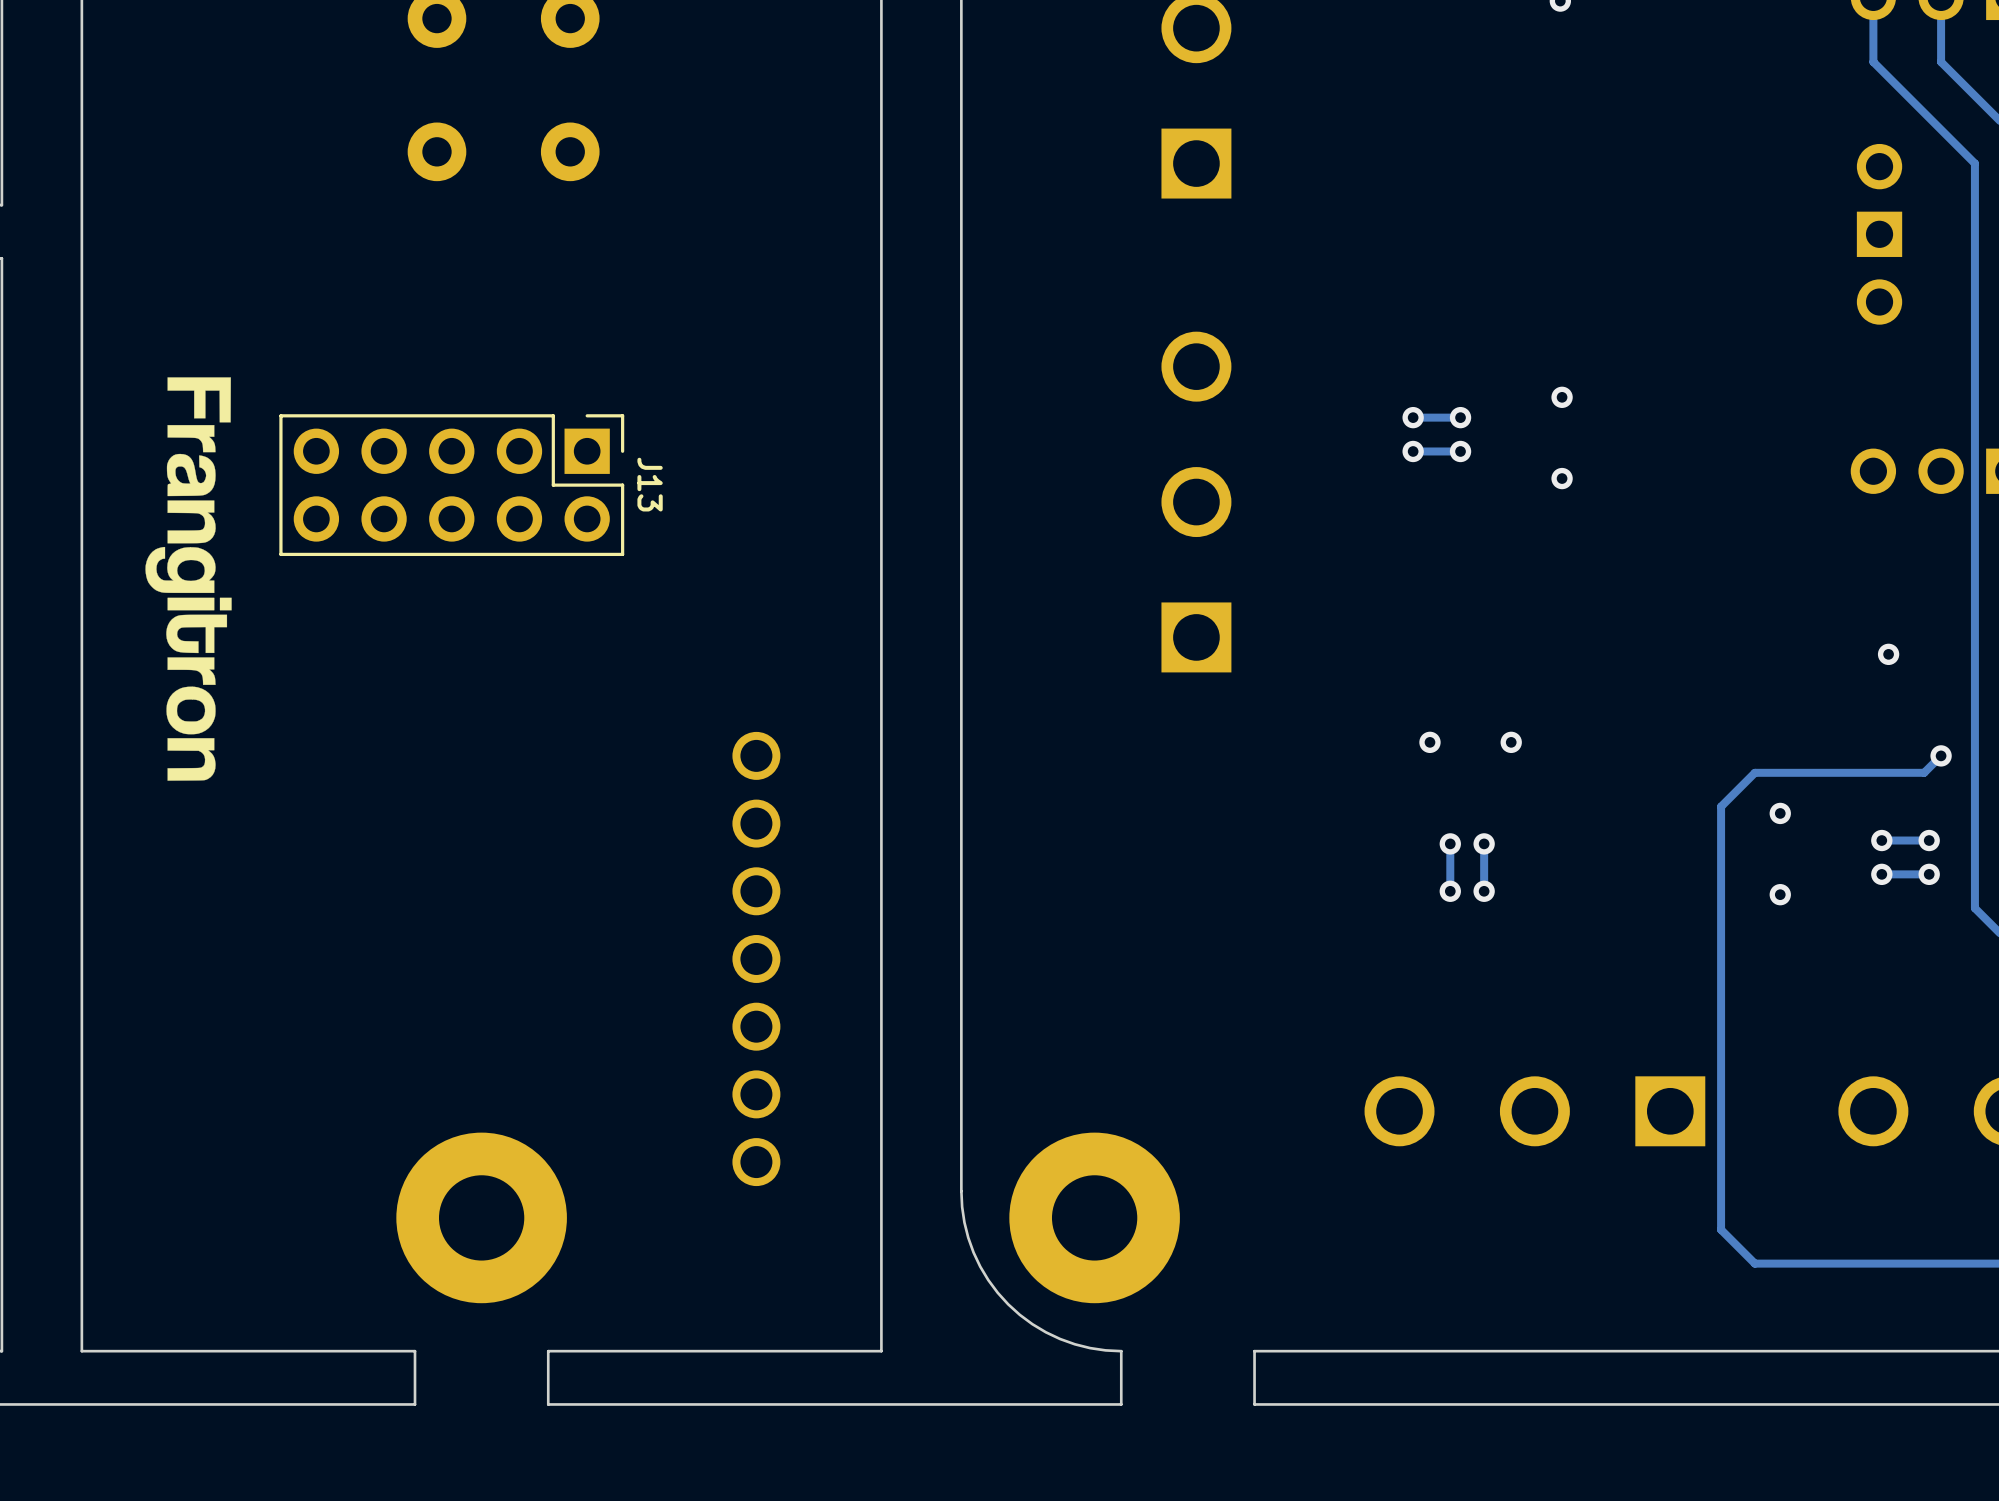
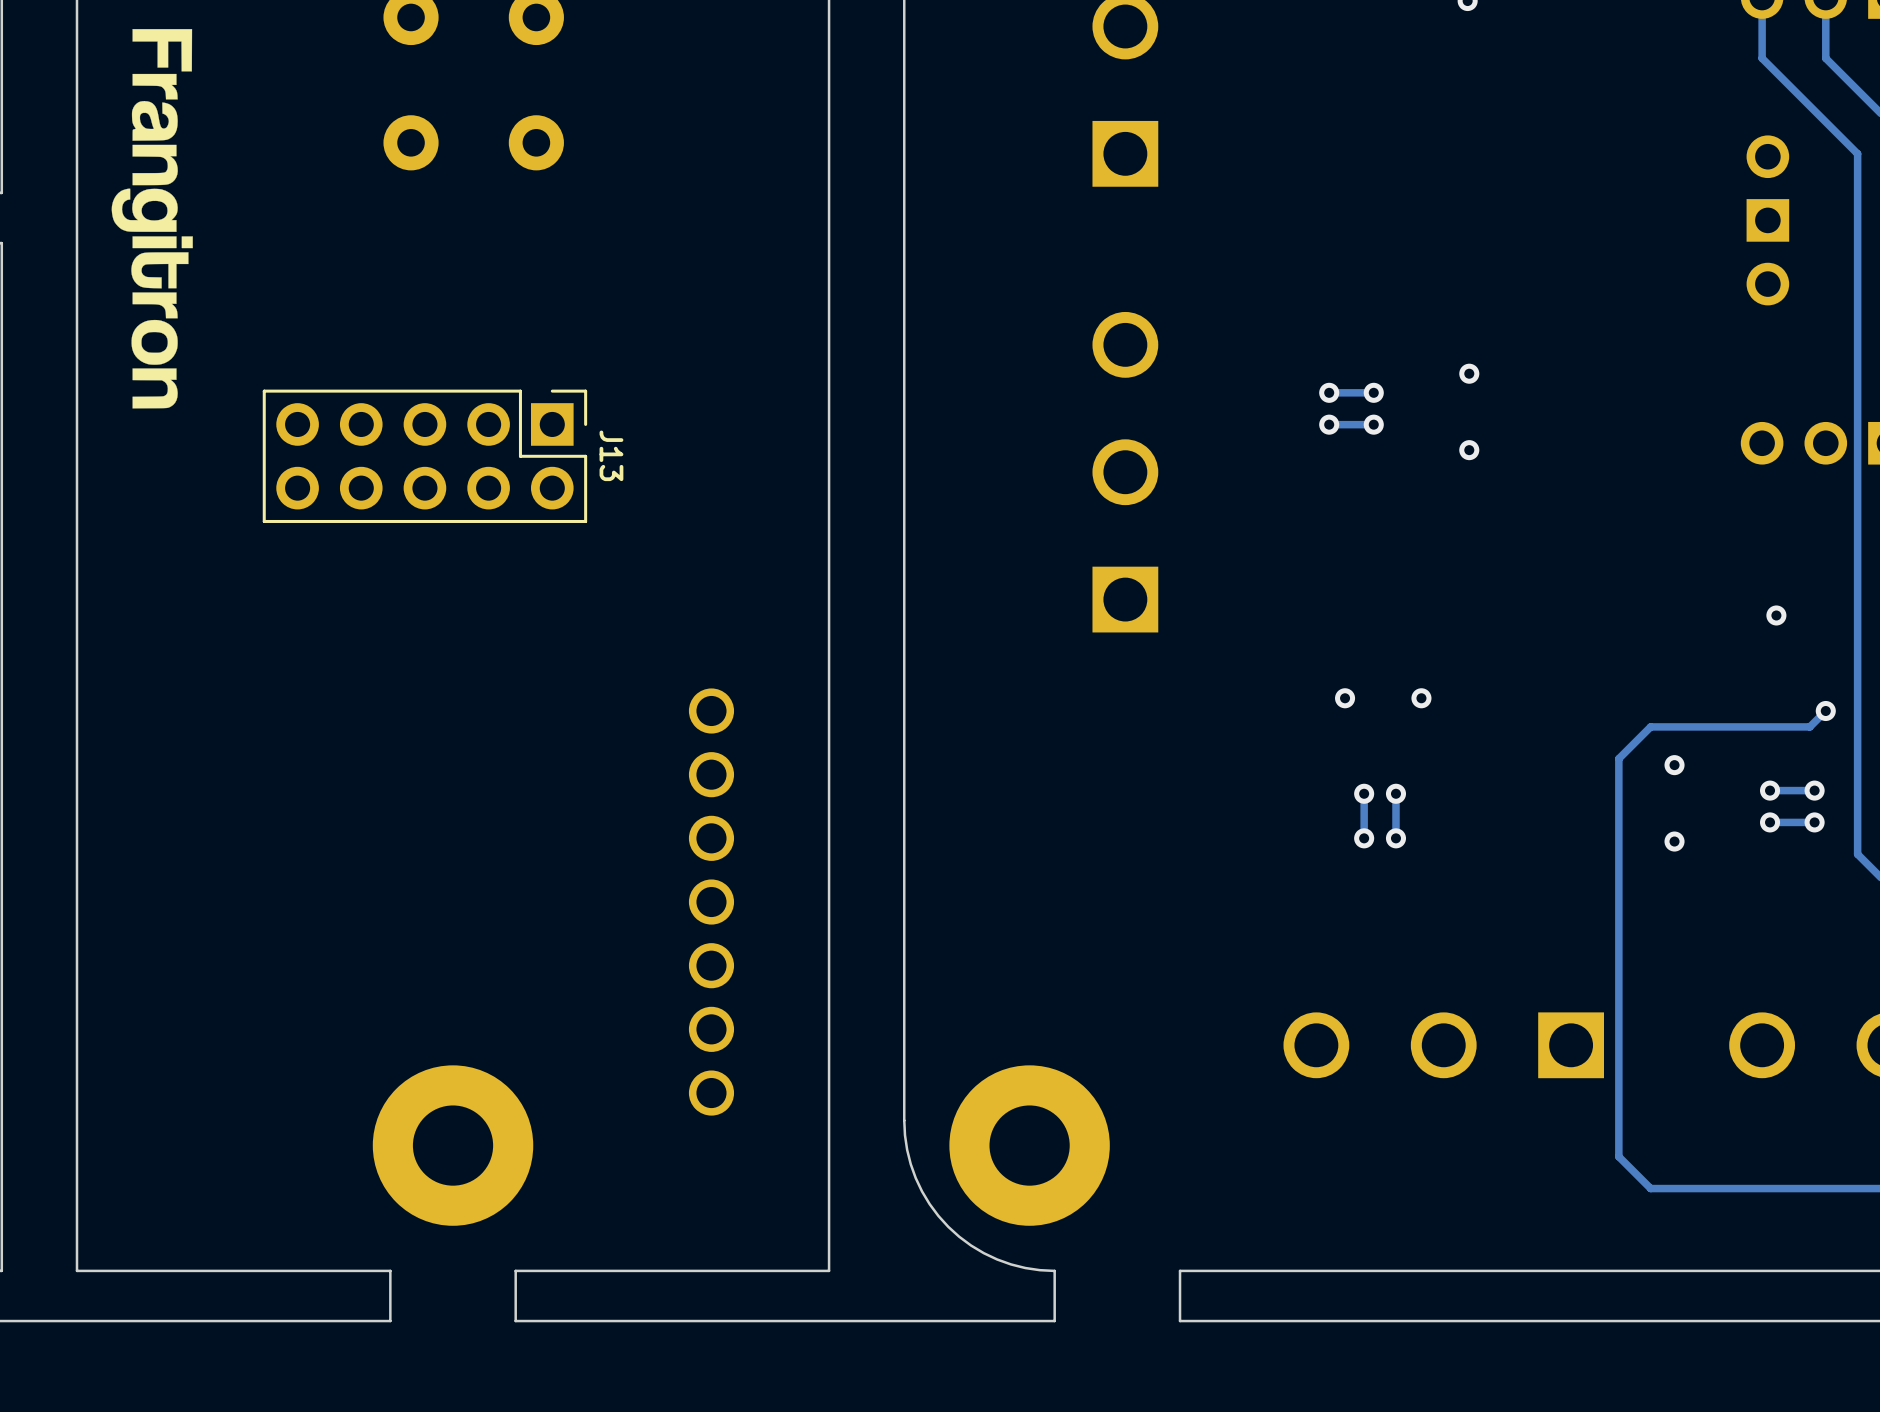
drawing position: (188, 579) -> (152, 218)

